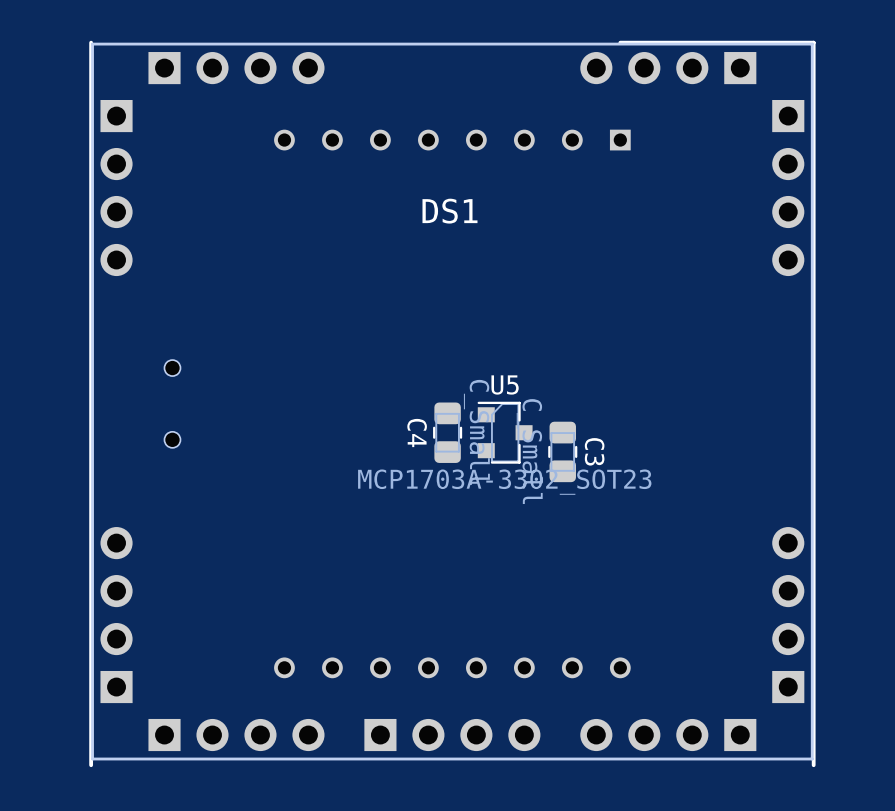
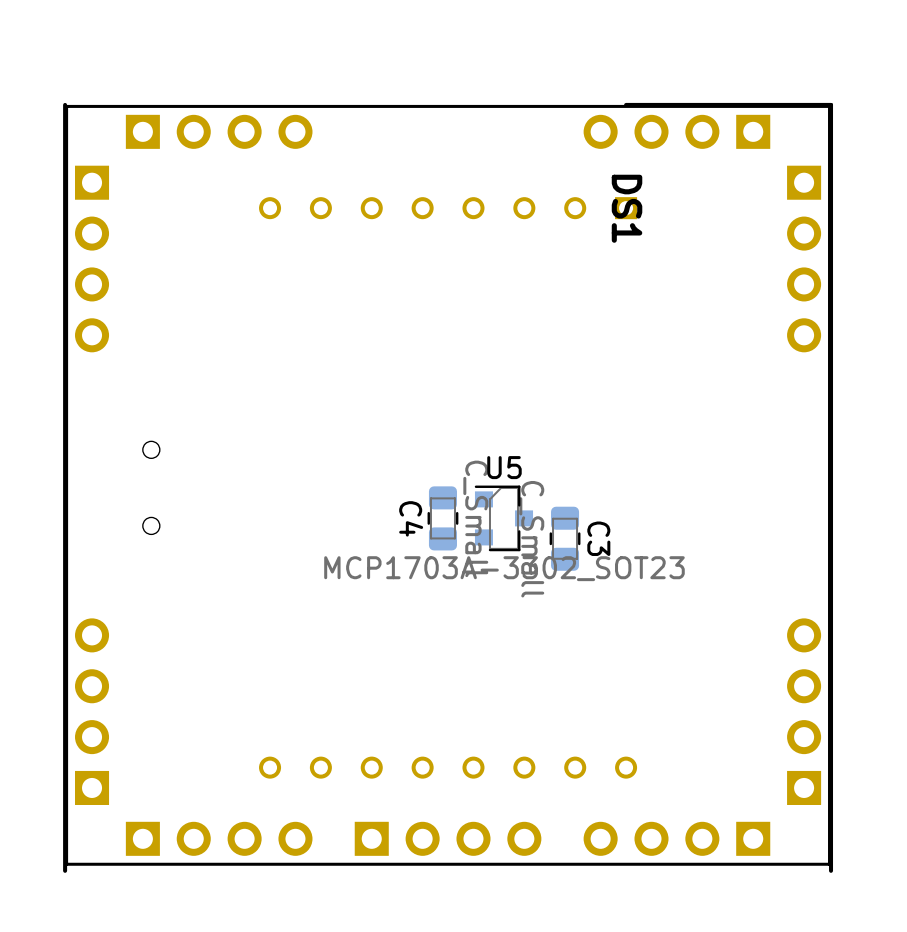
DS1 name rotation: 0° (449, 211) -> 90° clockwise (627, 208)
DS1 name position: DS1 (449, 211) -> DS1 (627, 208)

